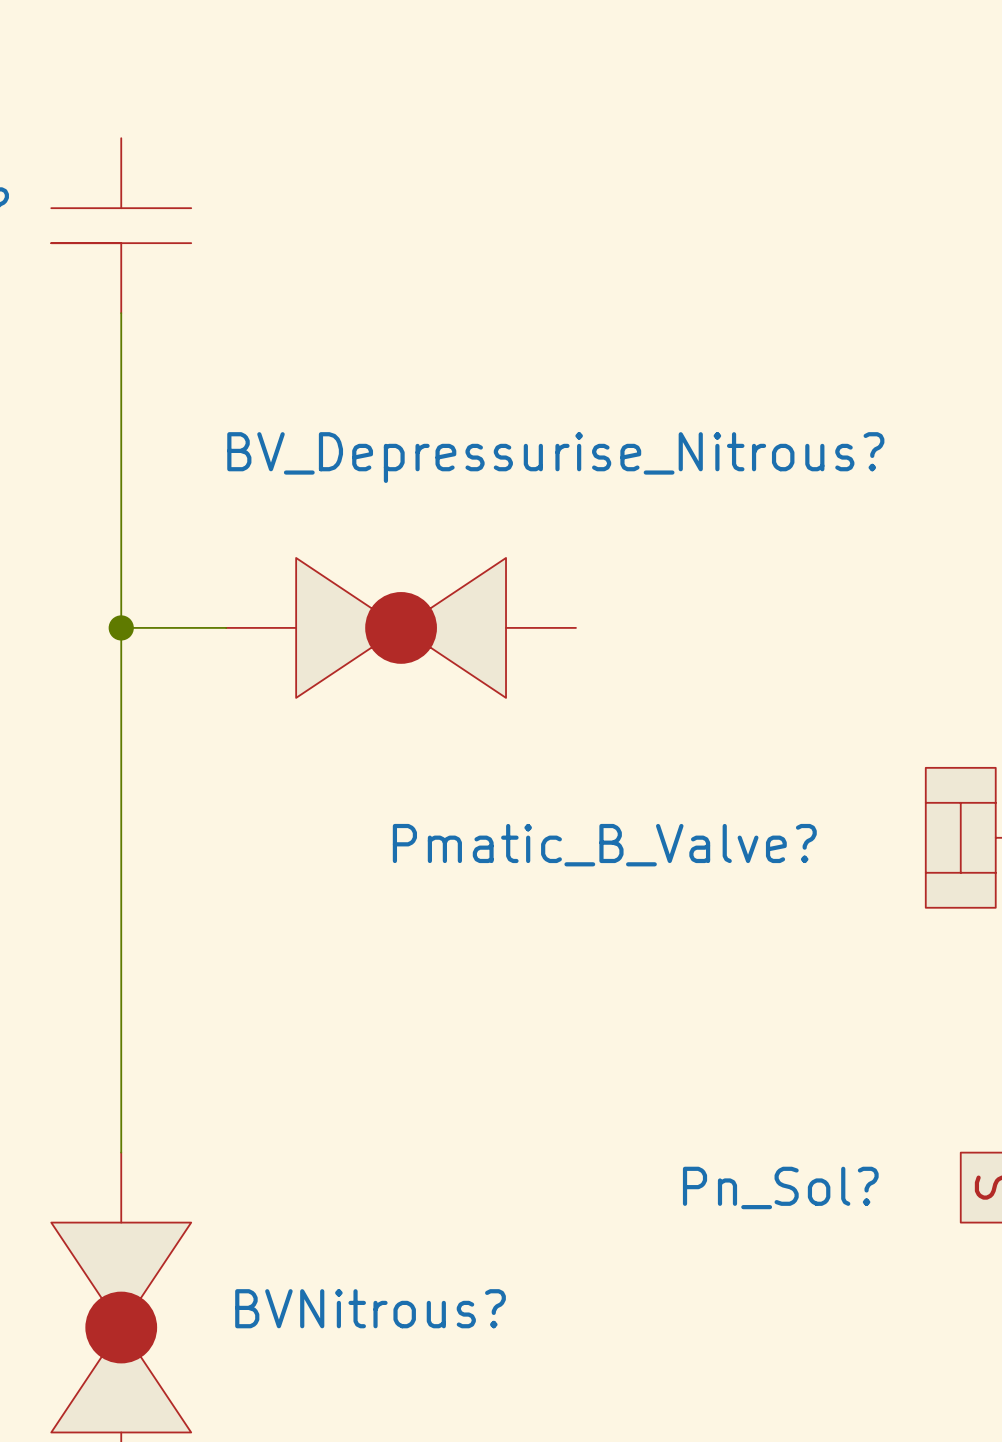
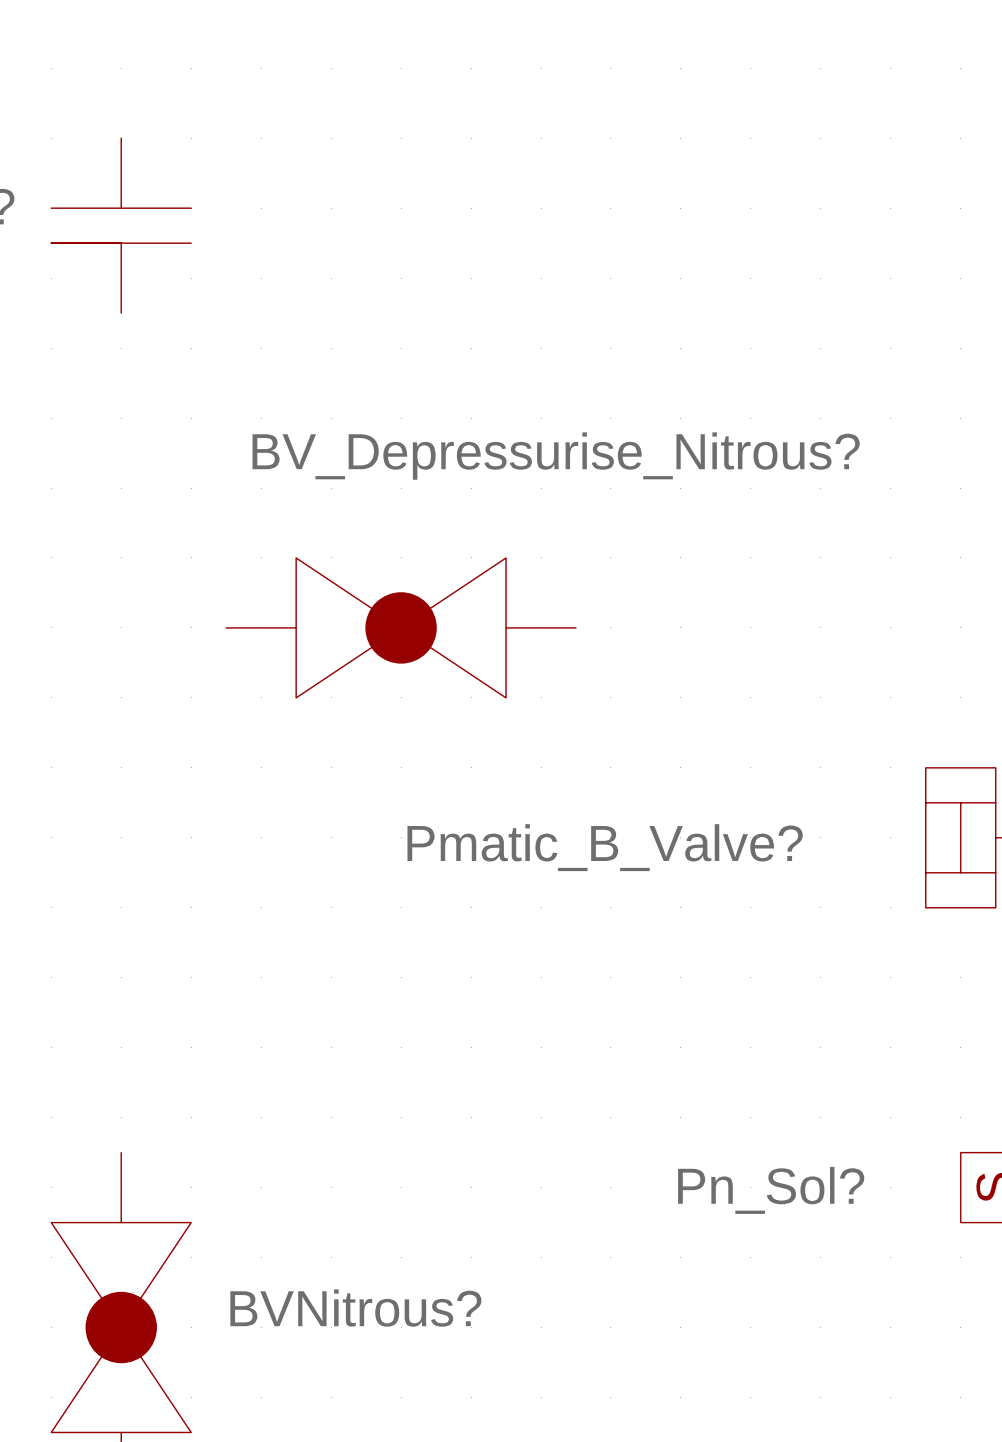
wire: (121, 313) (121, 1152) -> none
wire: (121, 627) (226, 627) -> none
junction: (121, 627) -> none

